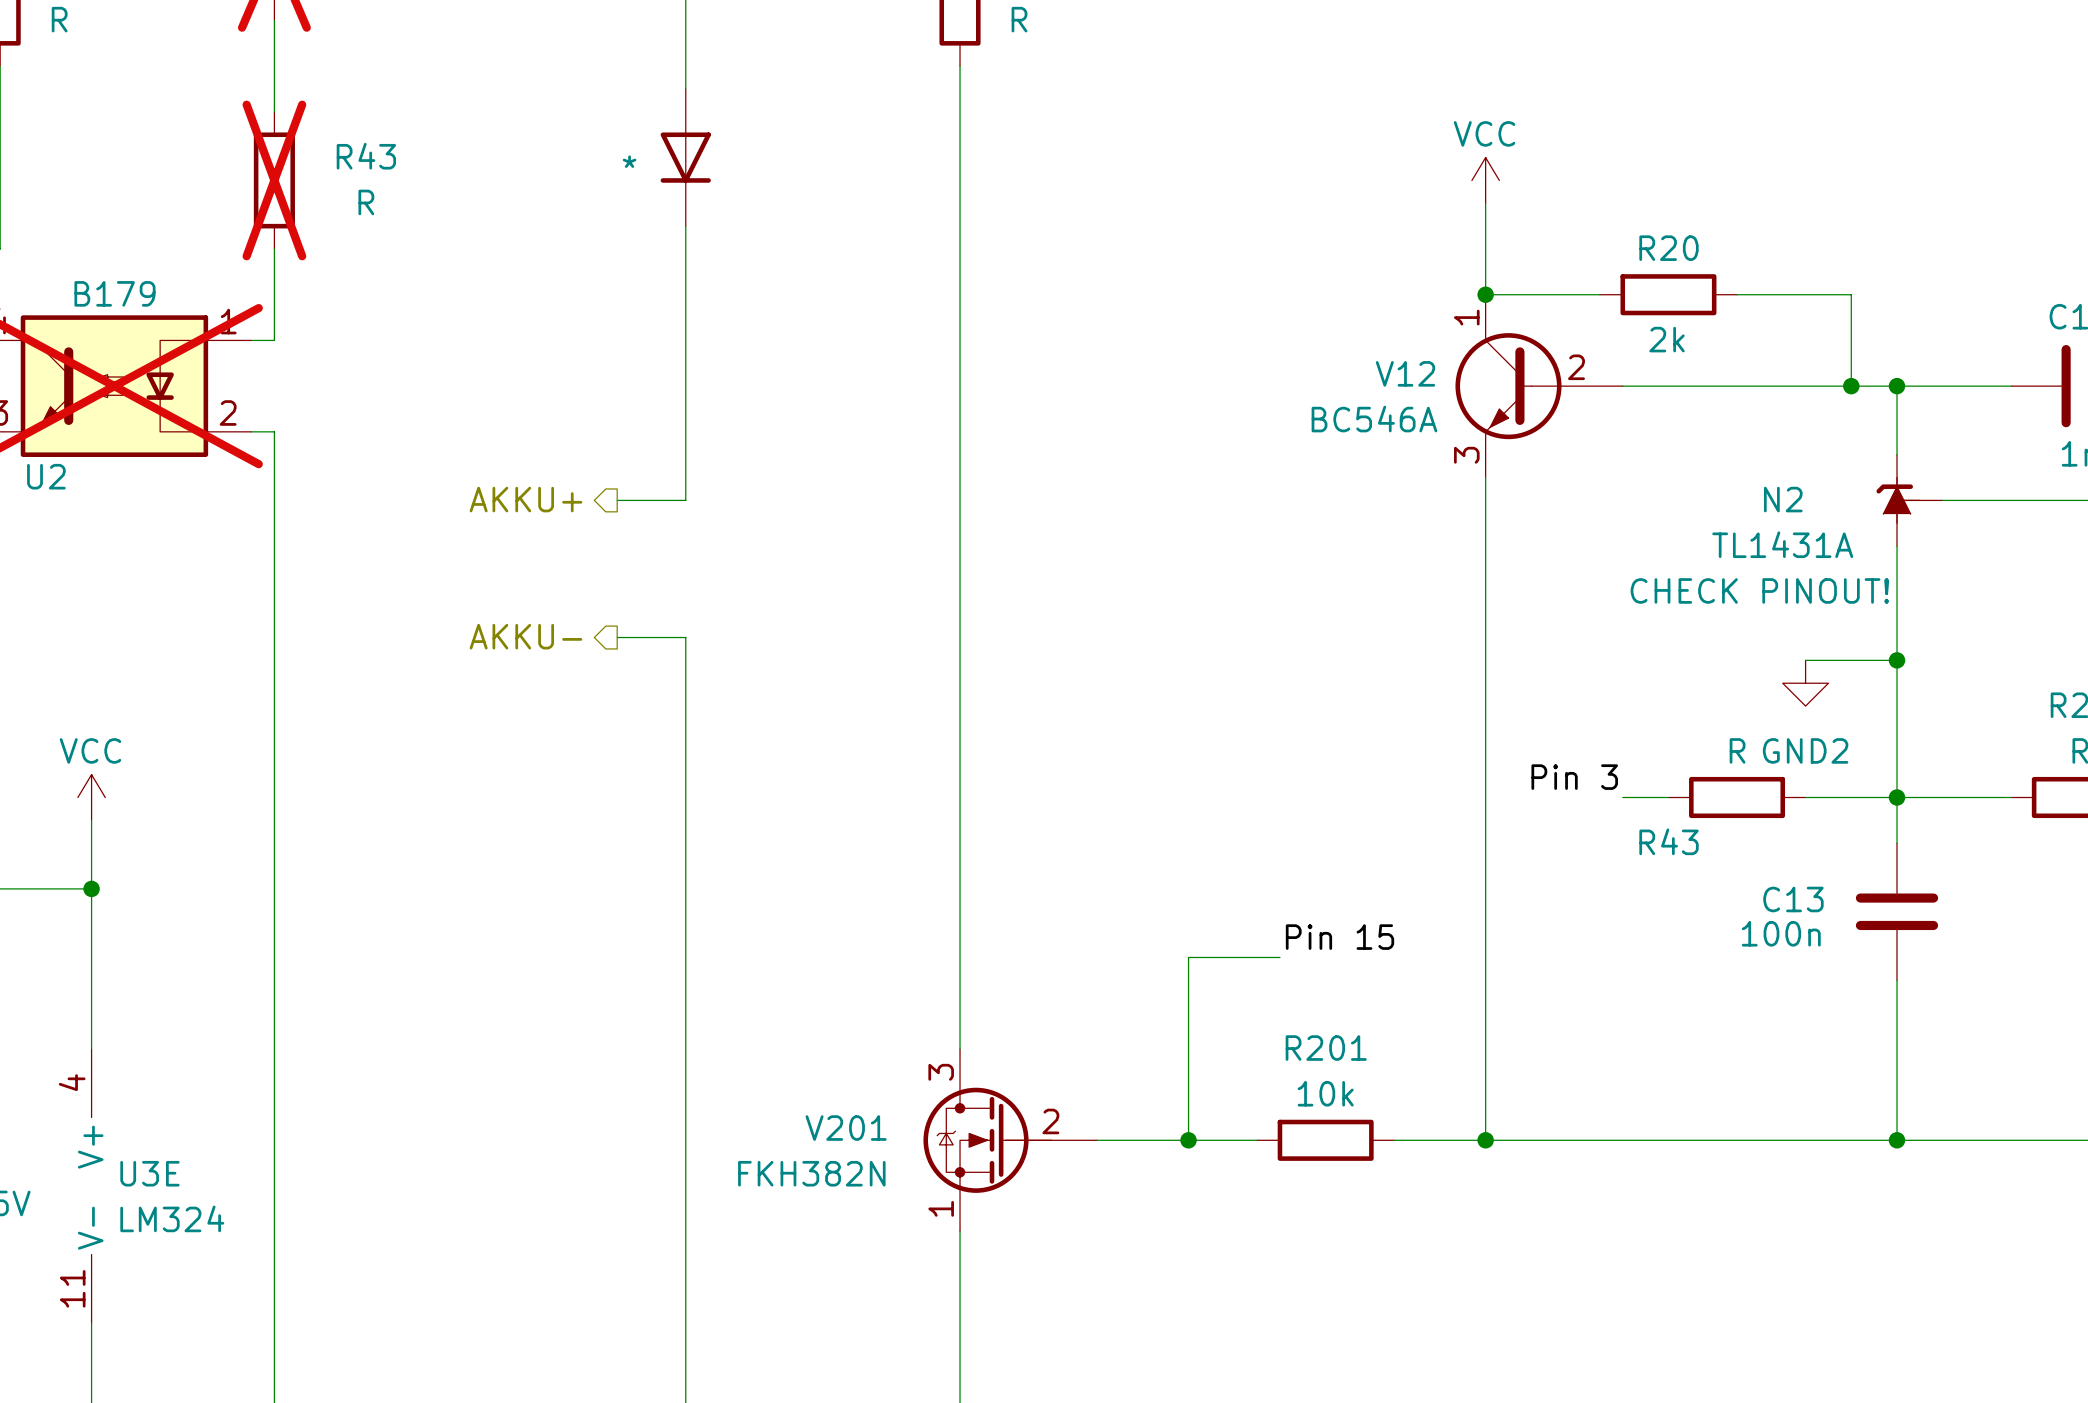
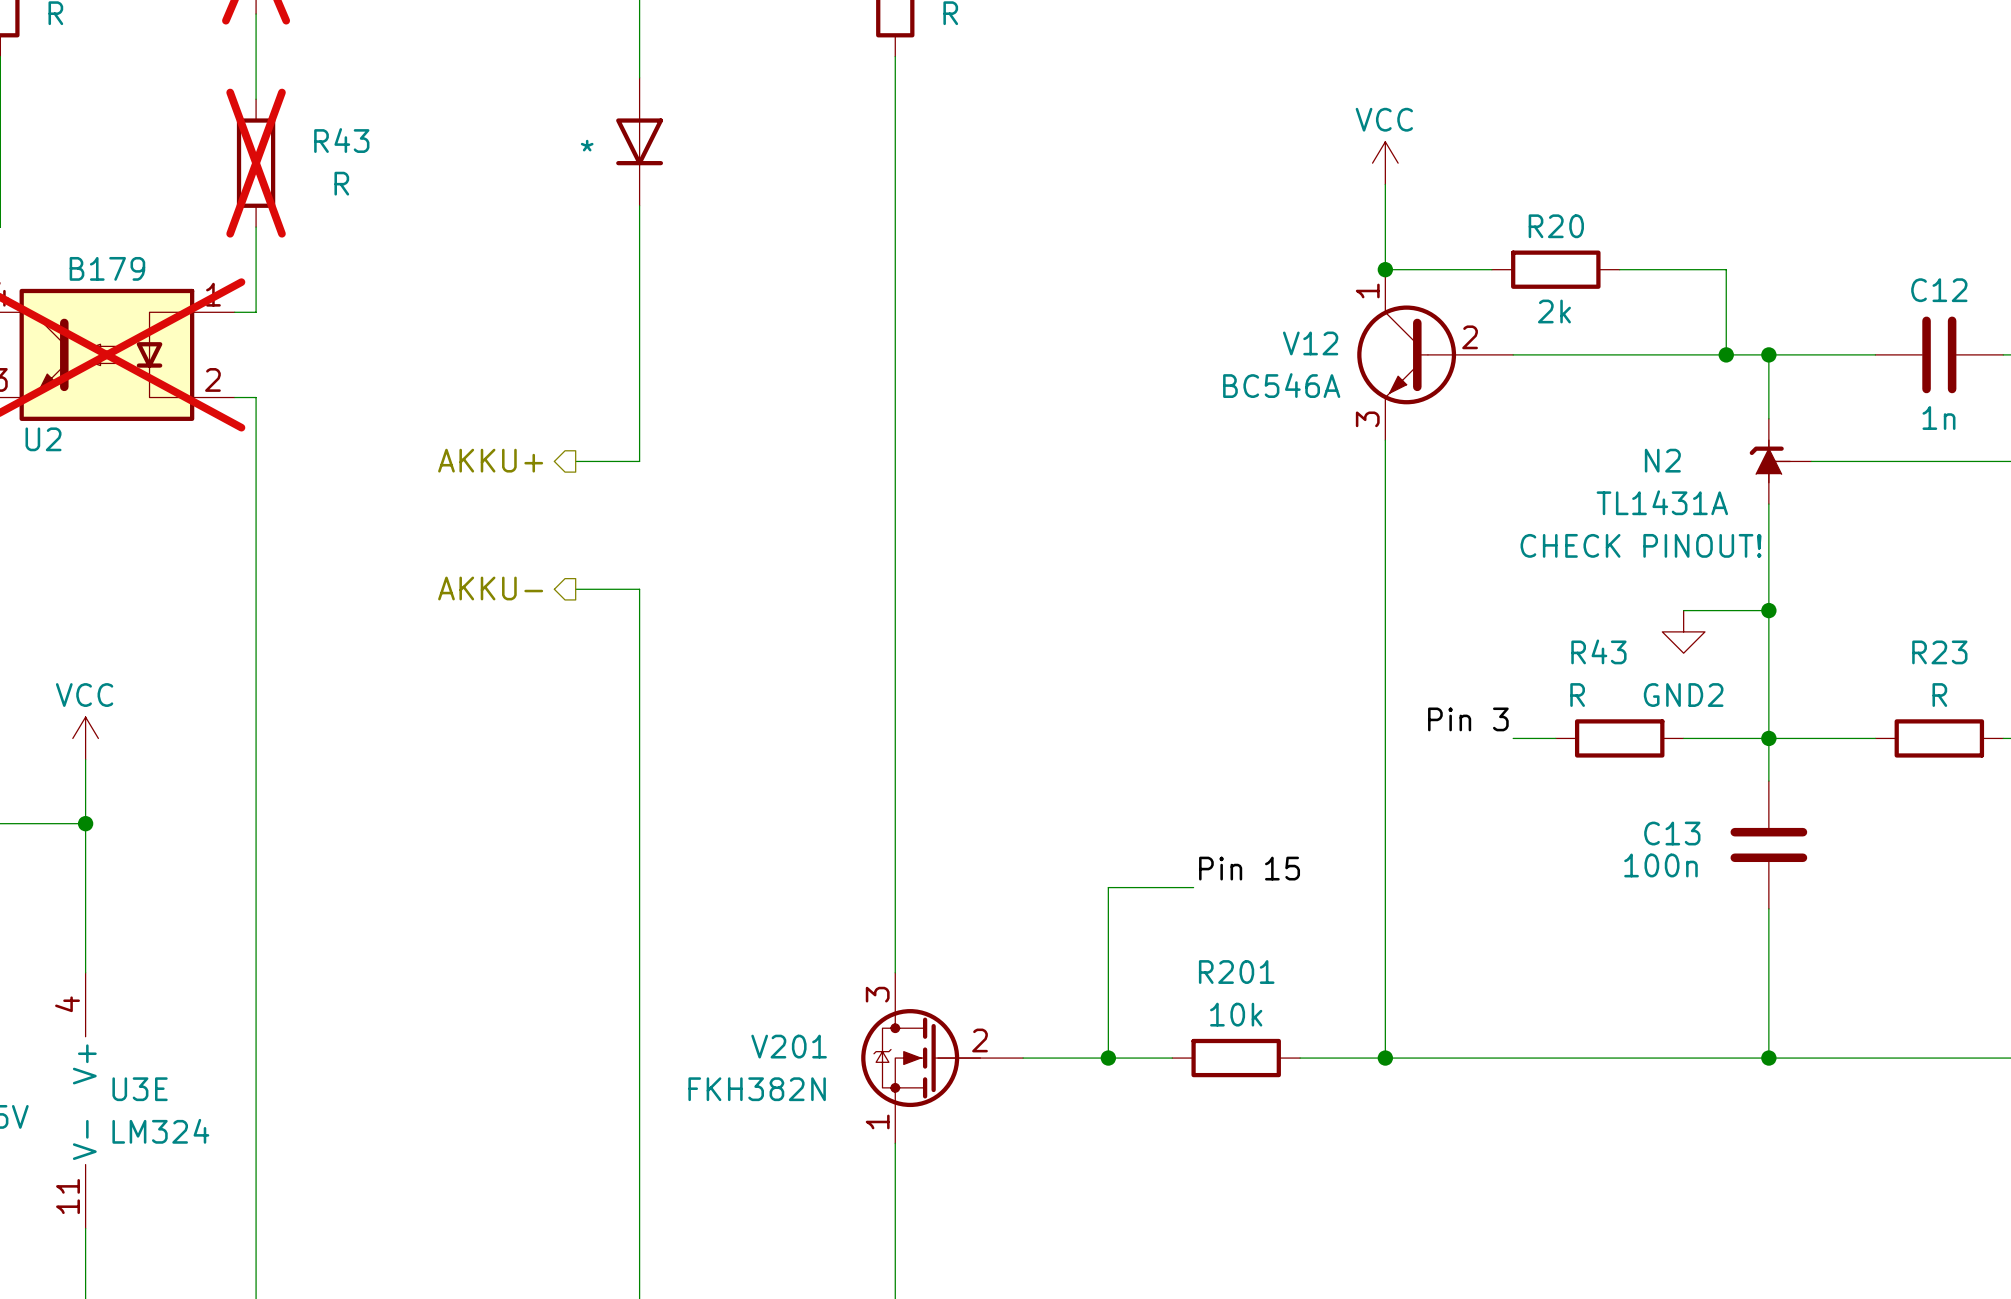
R43 value position: R (1737, 750) -> R (1577, 695)
R43 name position: R43 (1669, 841) -> R43 (1598, 651)

